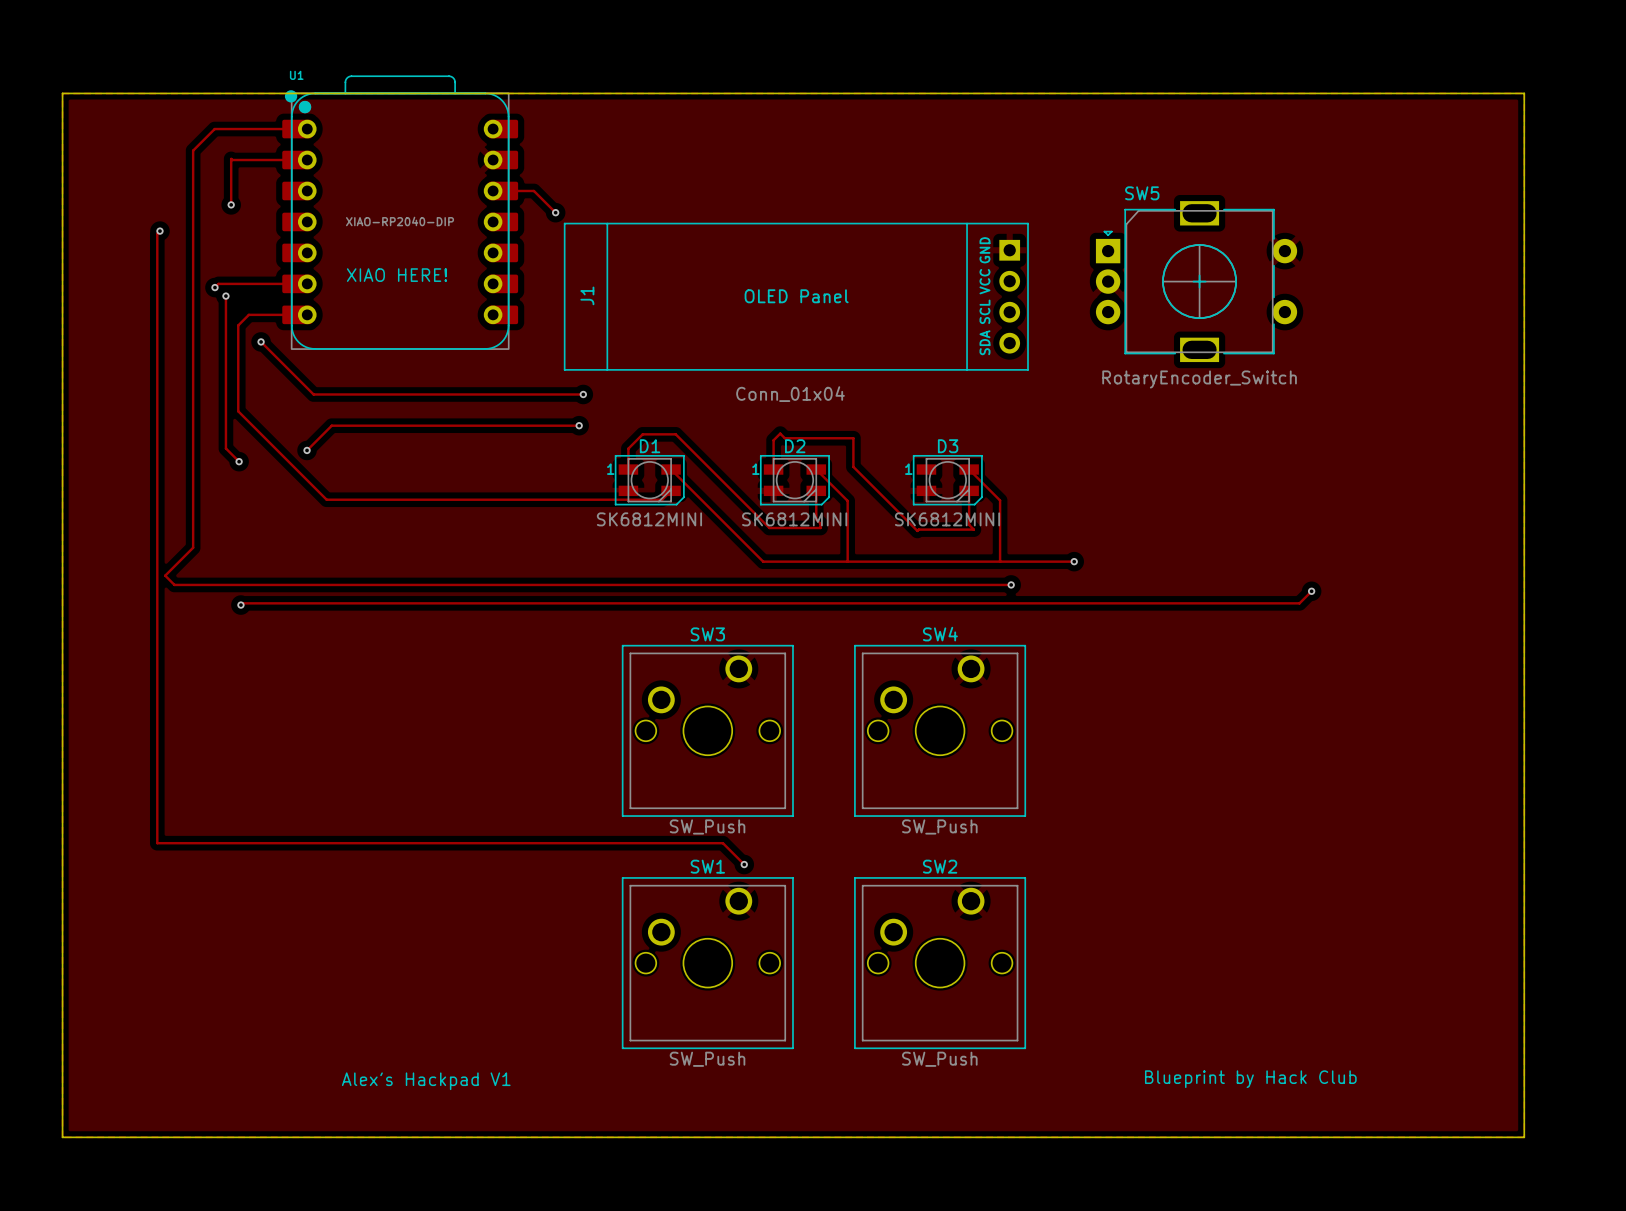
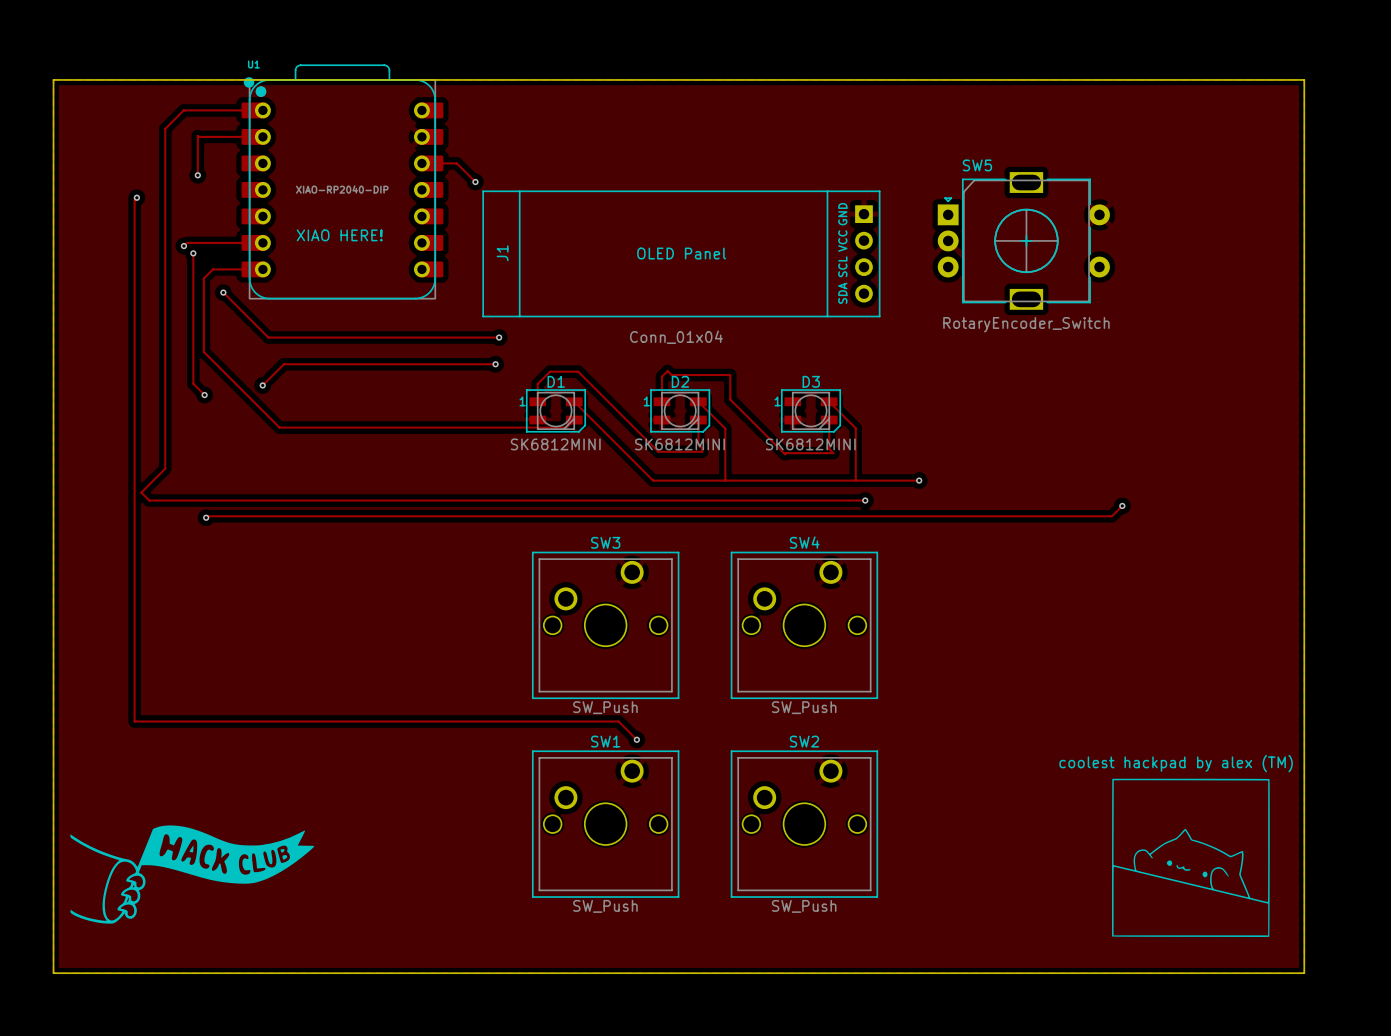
text: none -> coolest hackpad by alex (TM) (1176, 763)
drawing: none -> [1112, 778, 1270, 937]
drawing: none -> [70, 825, 315, 924]
text: Blueprint by Hack Club (1250, 1079) -> none
text: Alex's Hackpad V1 (426, 1081) -> none

